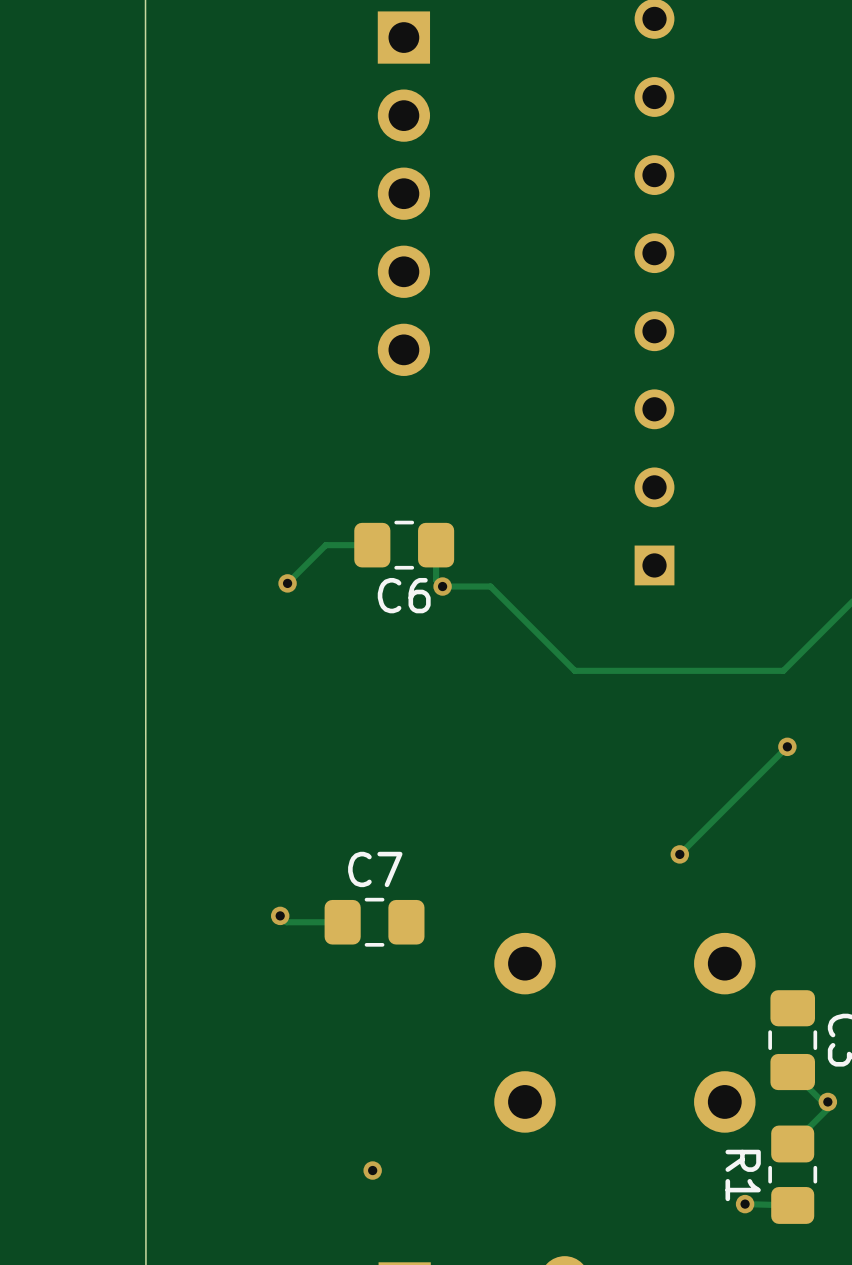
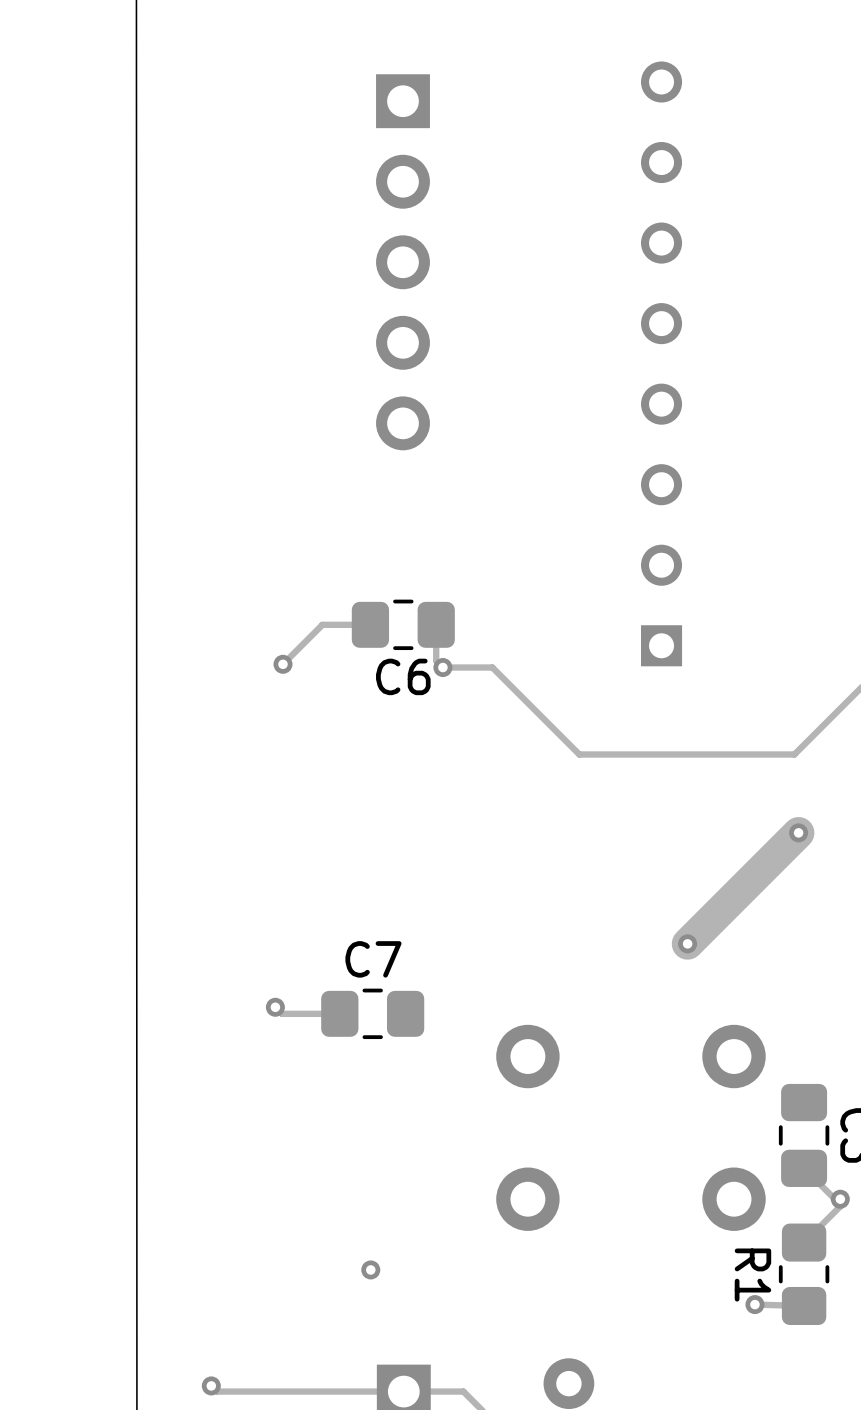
track width: thin (787, 746) (679, 854) -> thick (798, 832) (687, 943)

